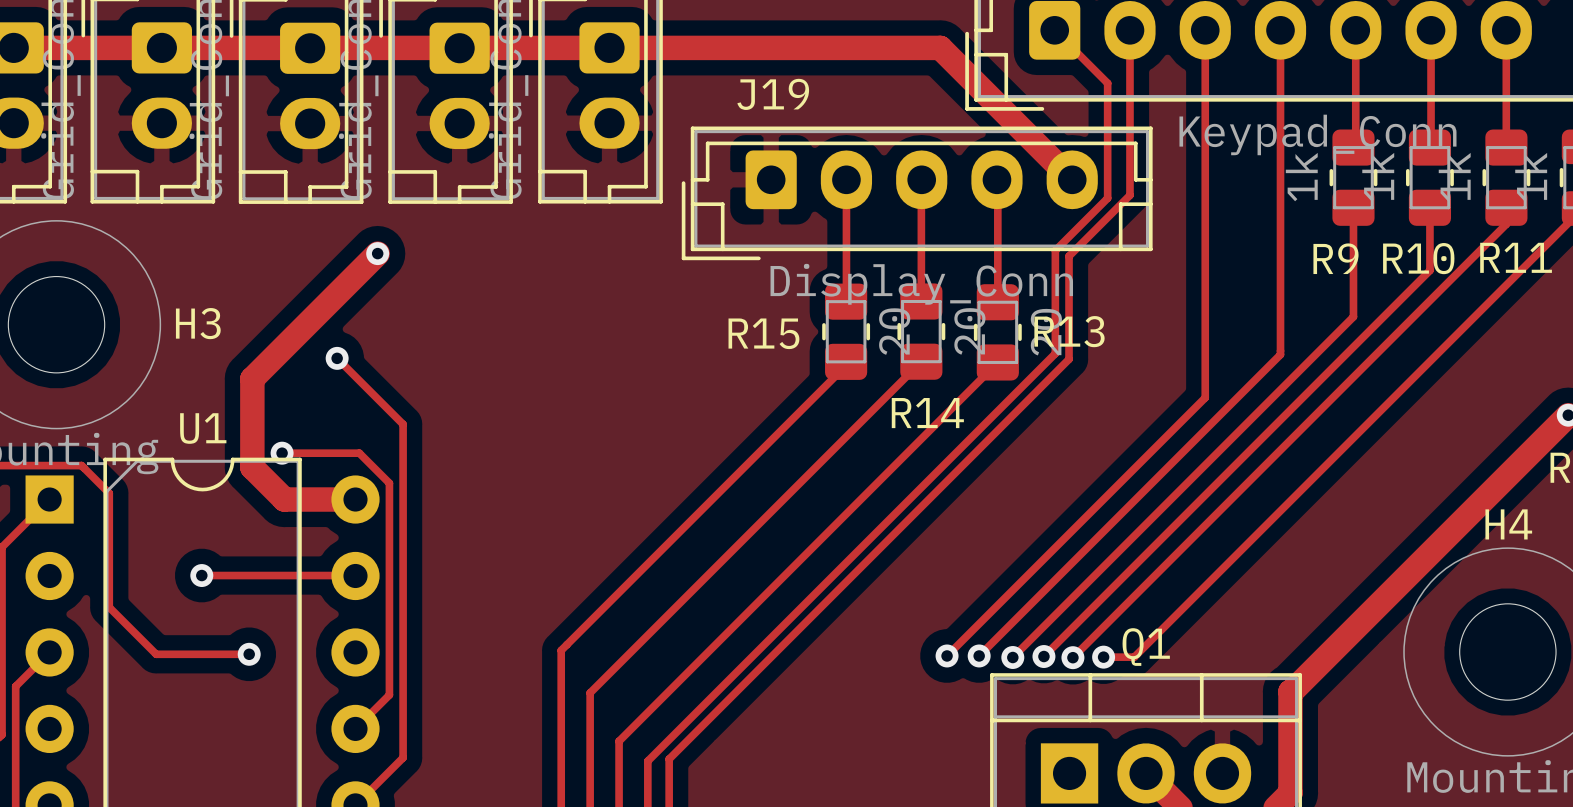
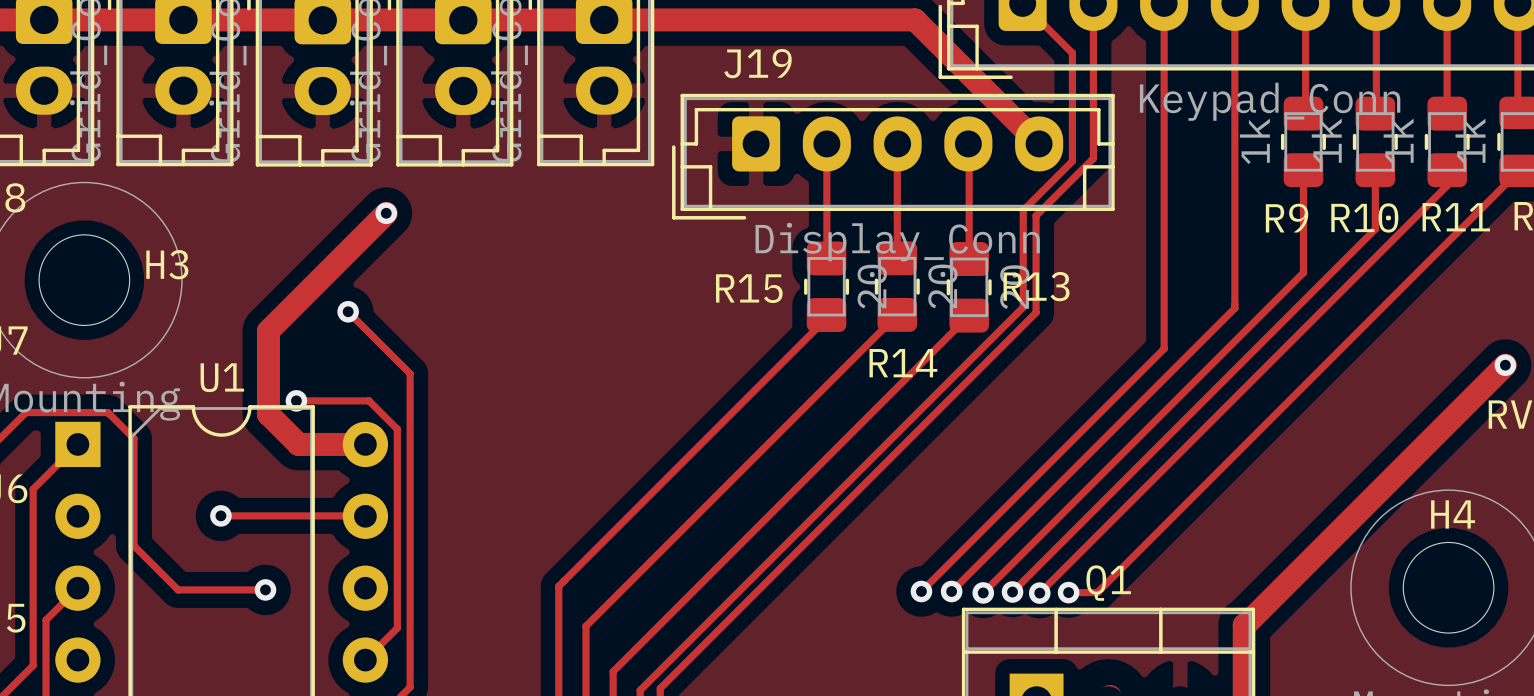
H3 name position: H3 (198, 323) -> H3 (167, 264)
H4 name position: H4 (1508, 524) -> H4 (1453, 514)

